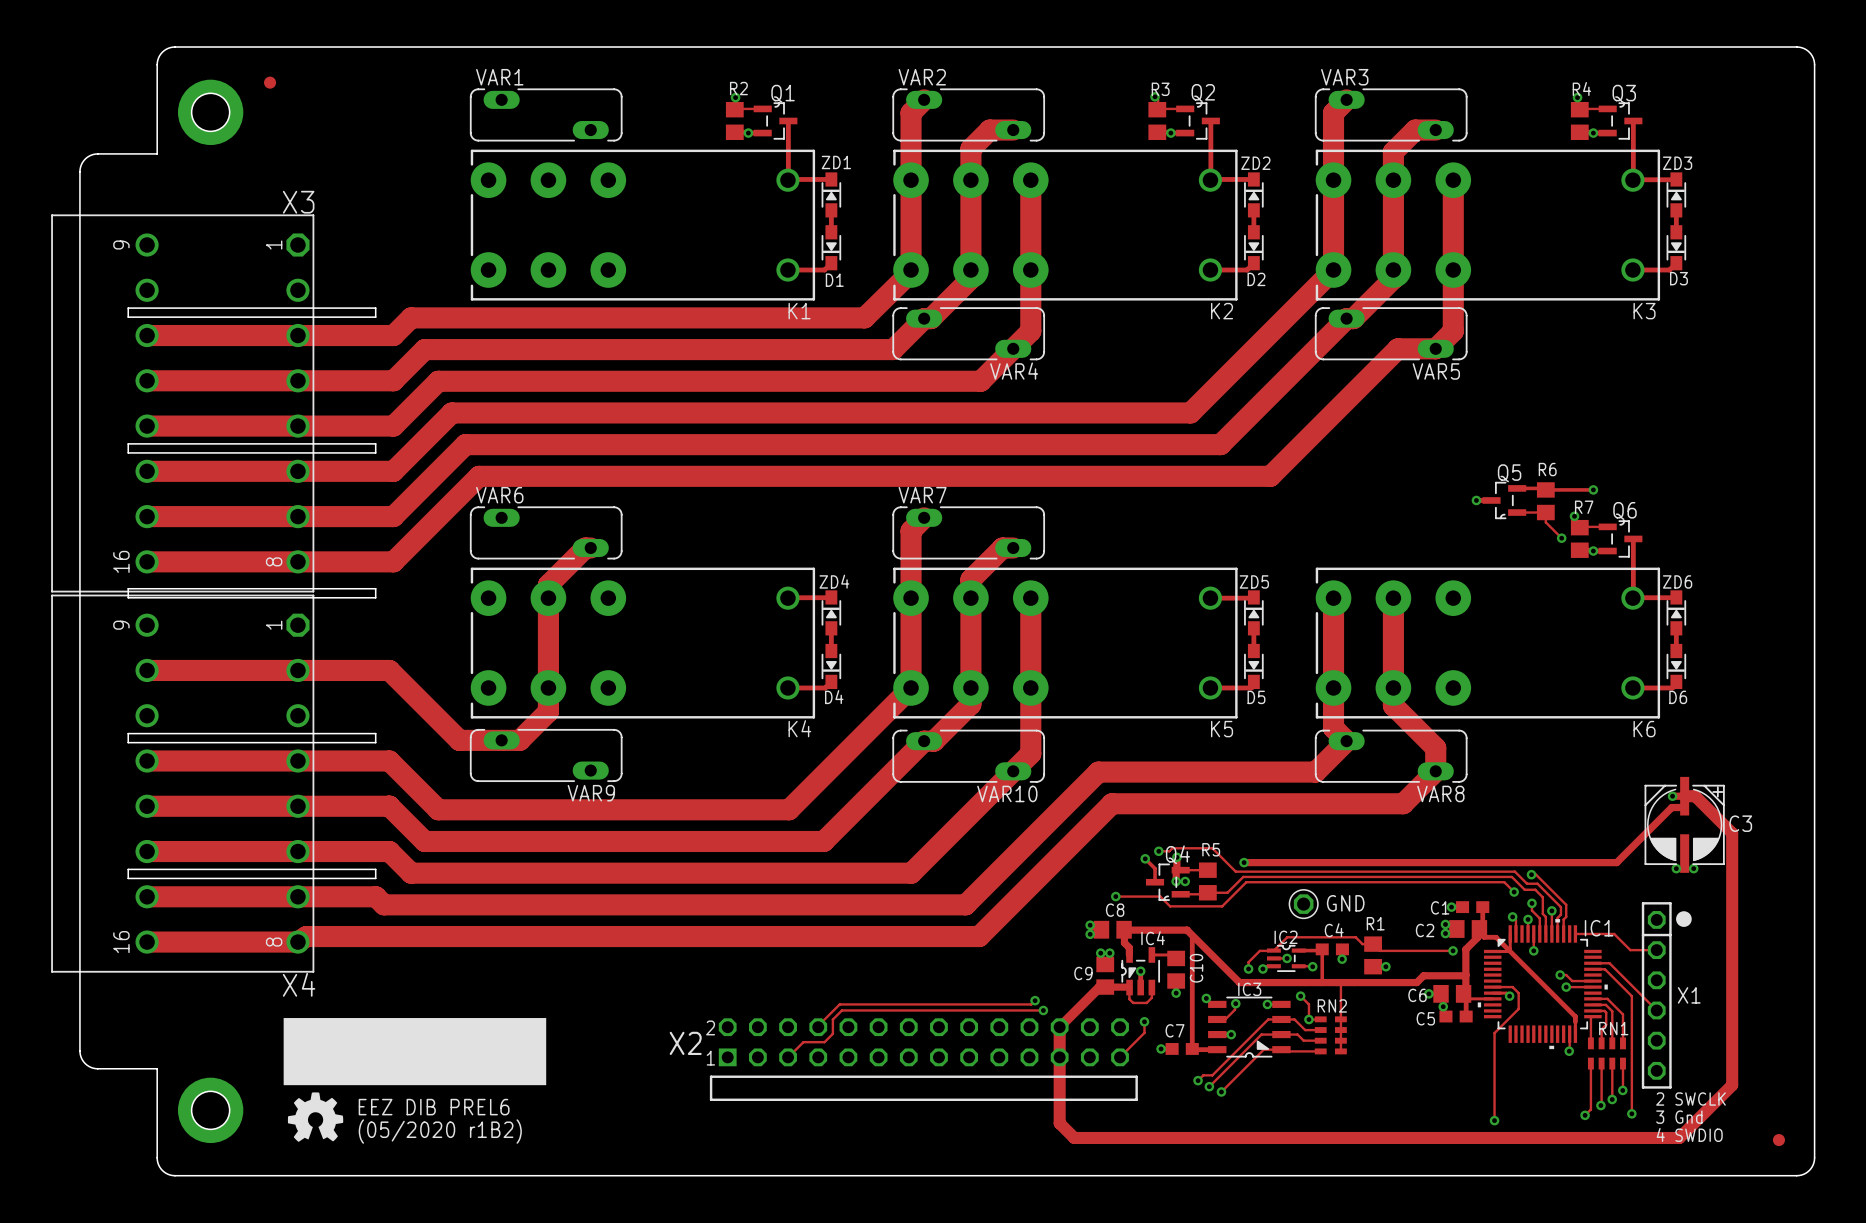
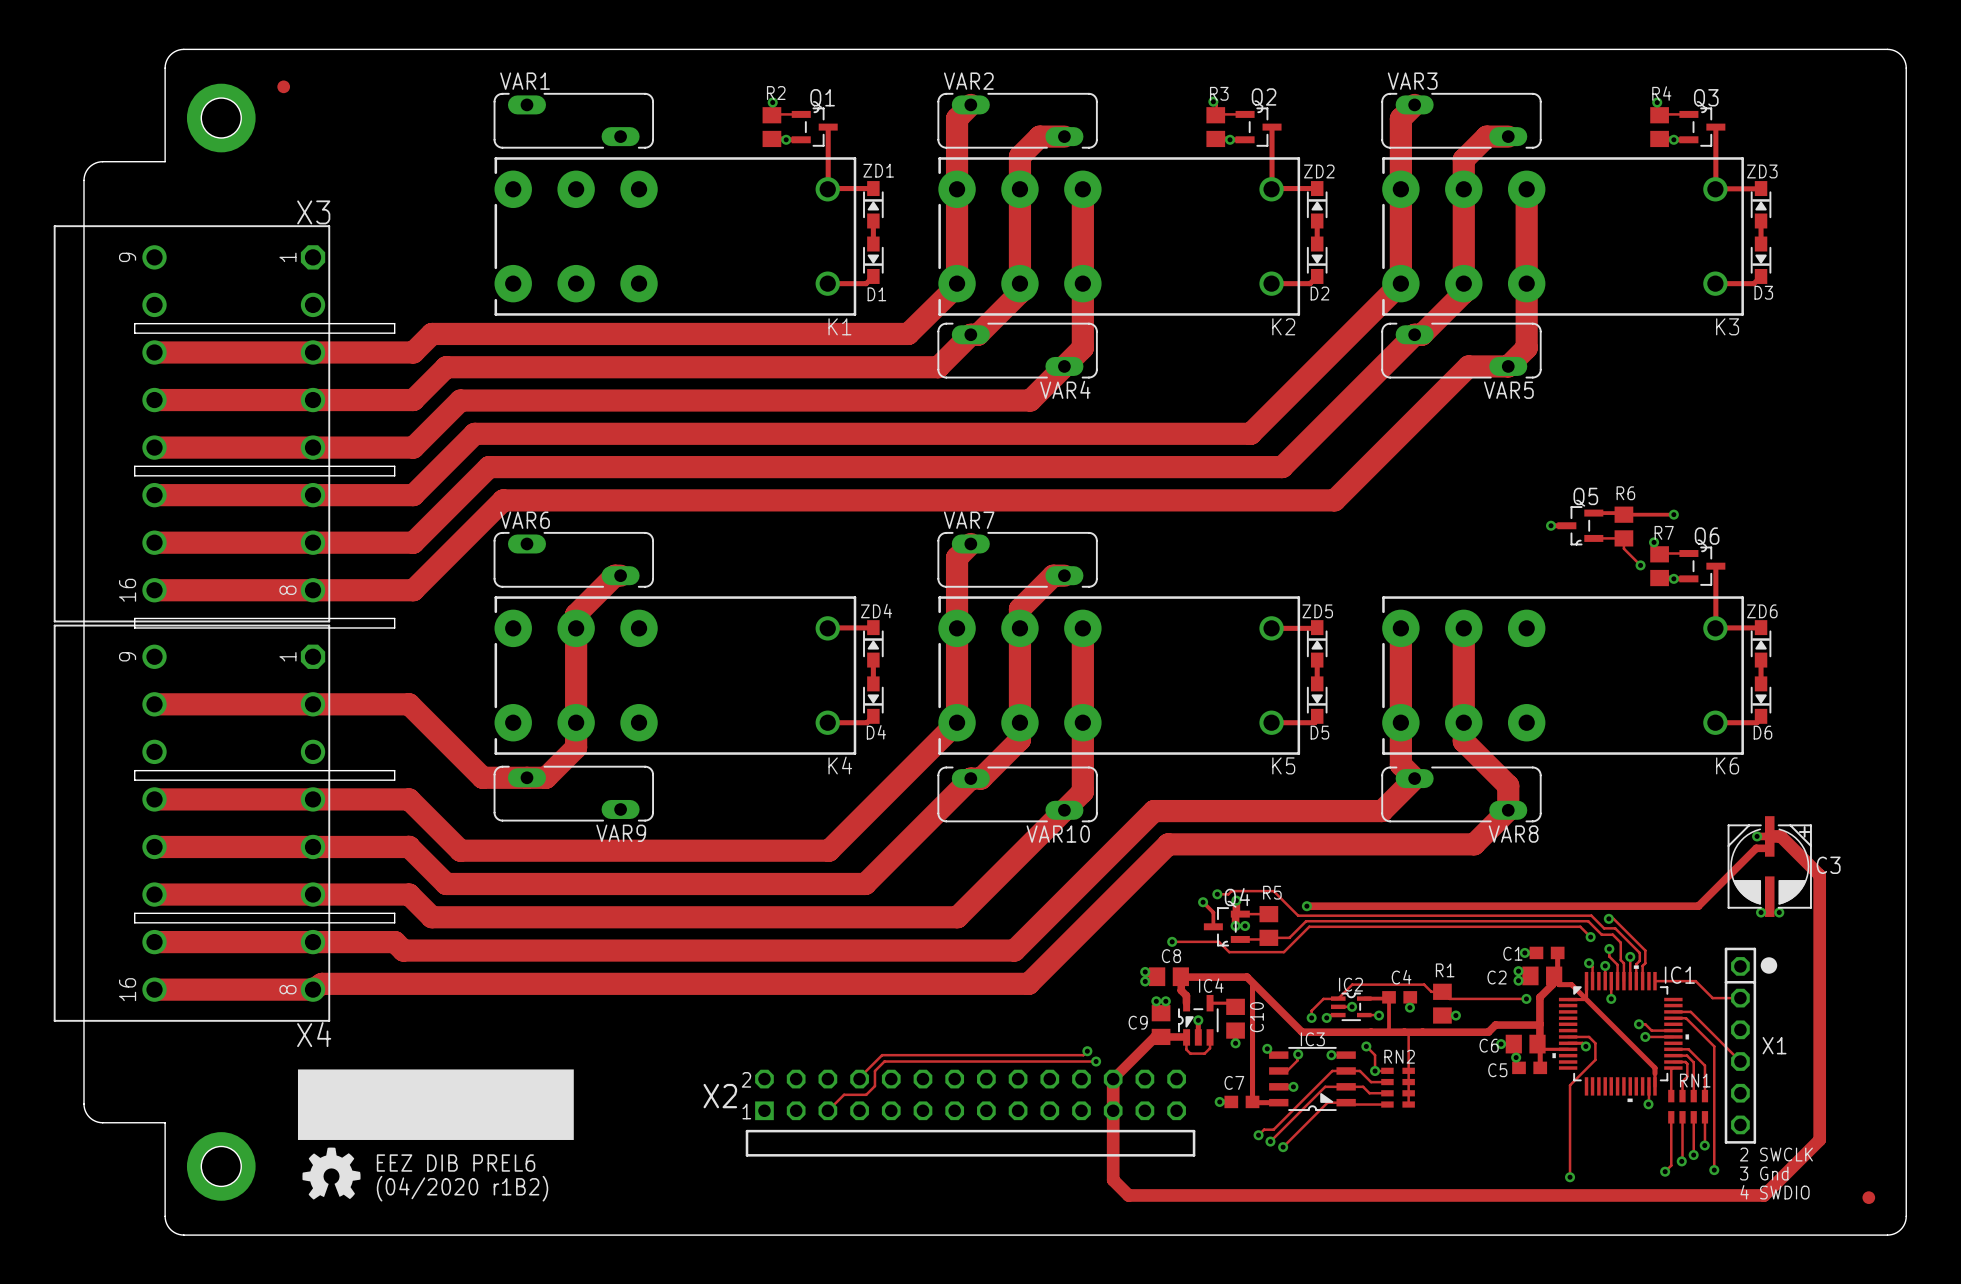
GND: (1303, 904) -> none
track: (1144, 1021) (1144, 1032) (1120, 1057) -> none
via: (1144, 1021) -> none
text: (05/2020 r1B2) (440, 1131) -> (04/2020 r1B2) (462, 1188)

